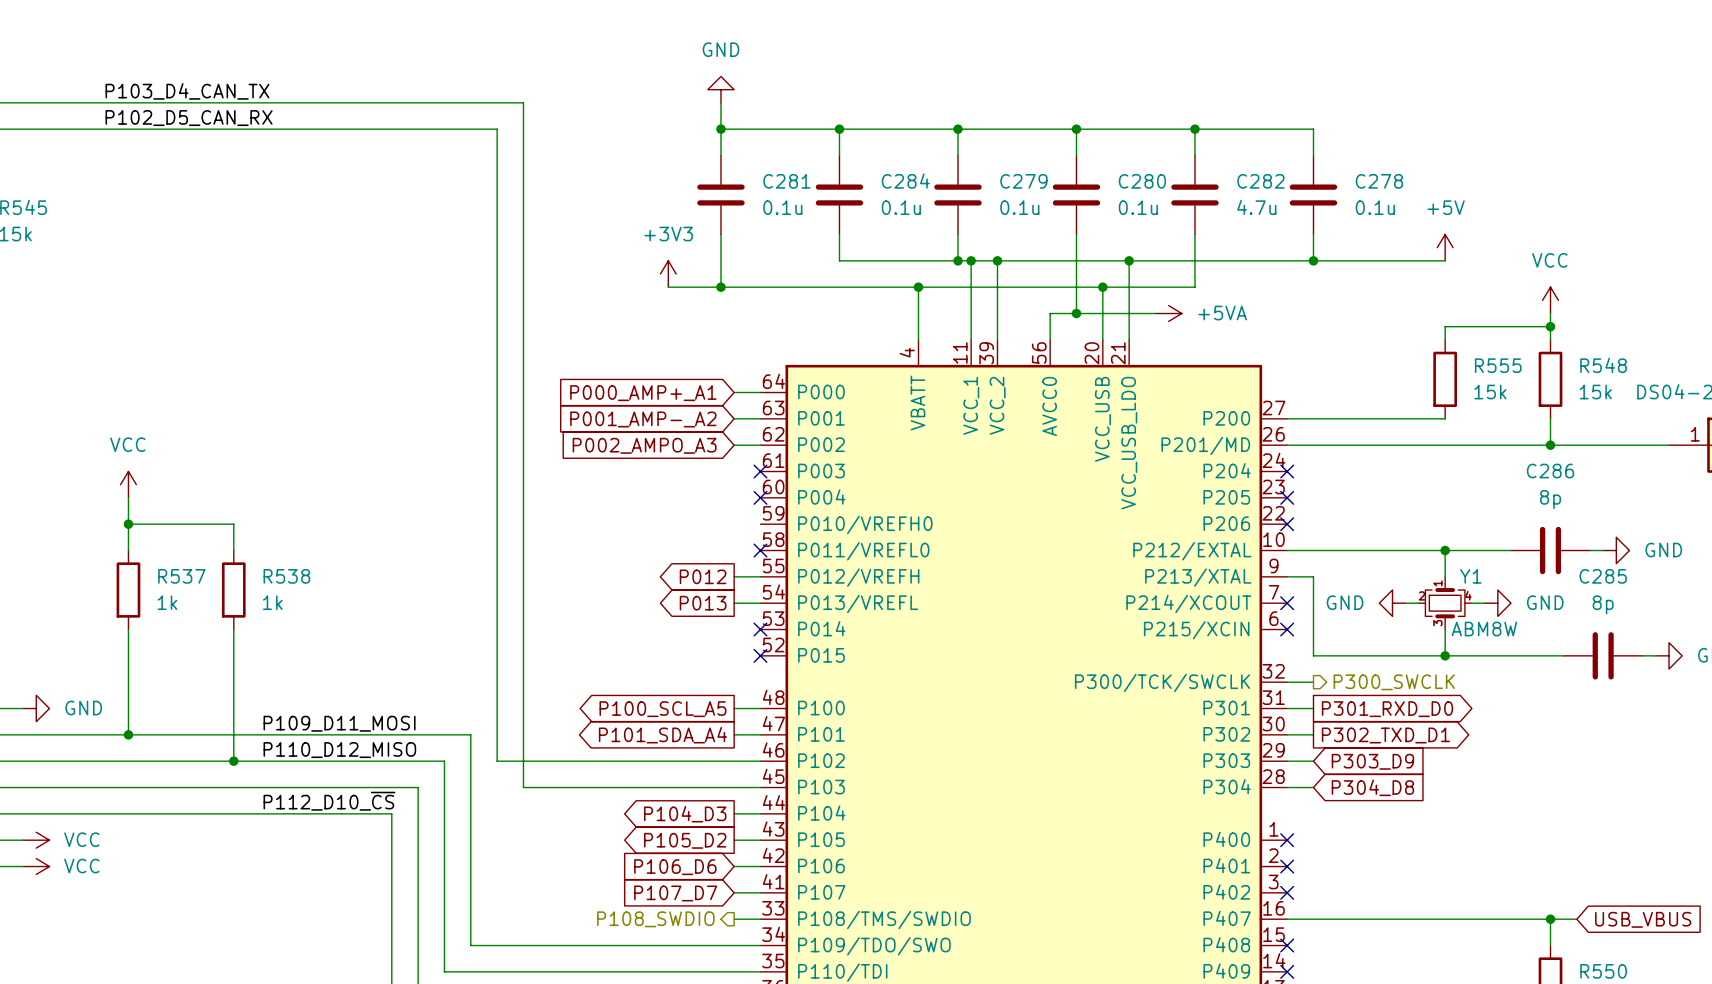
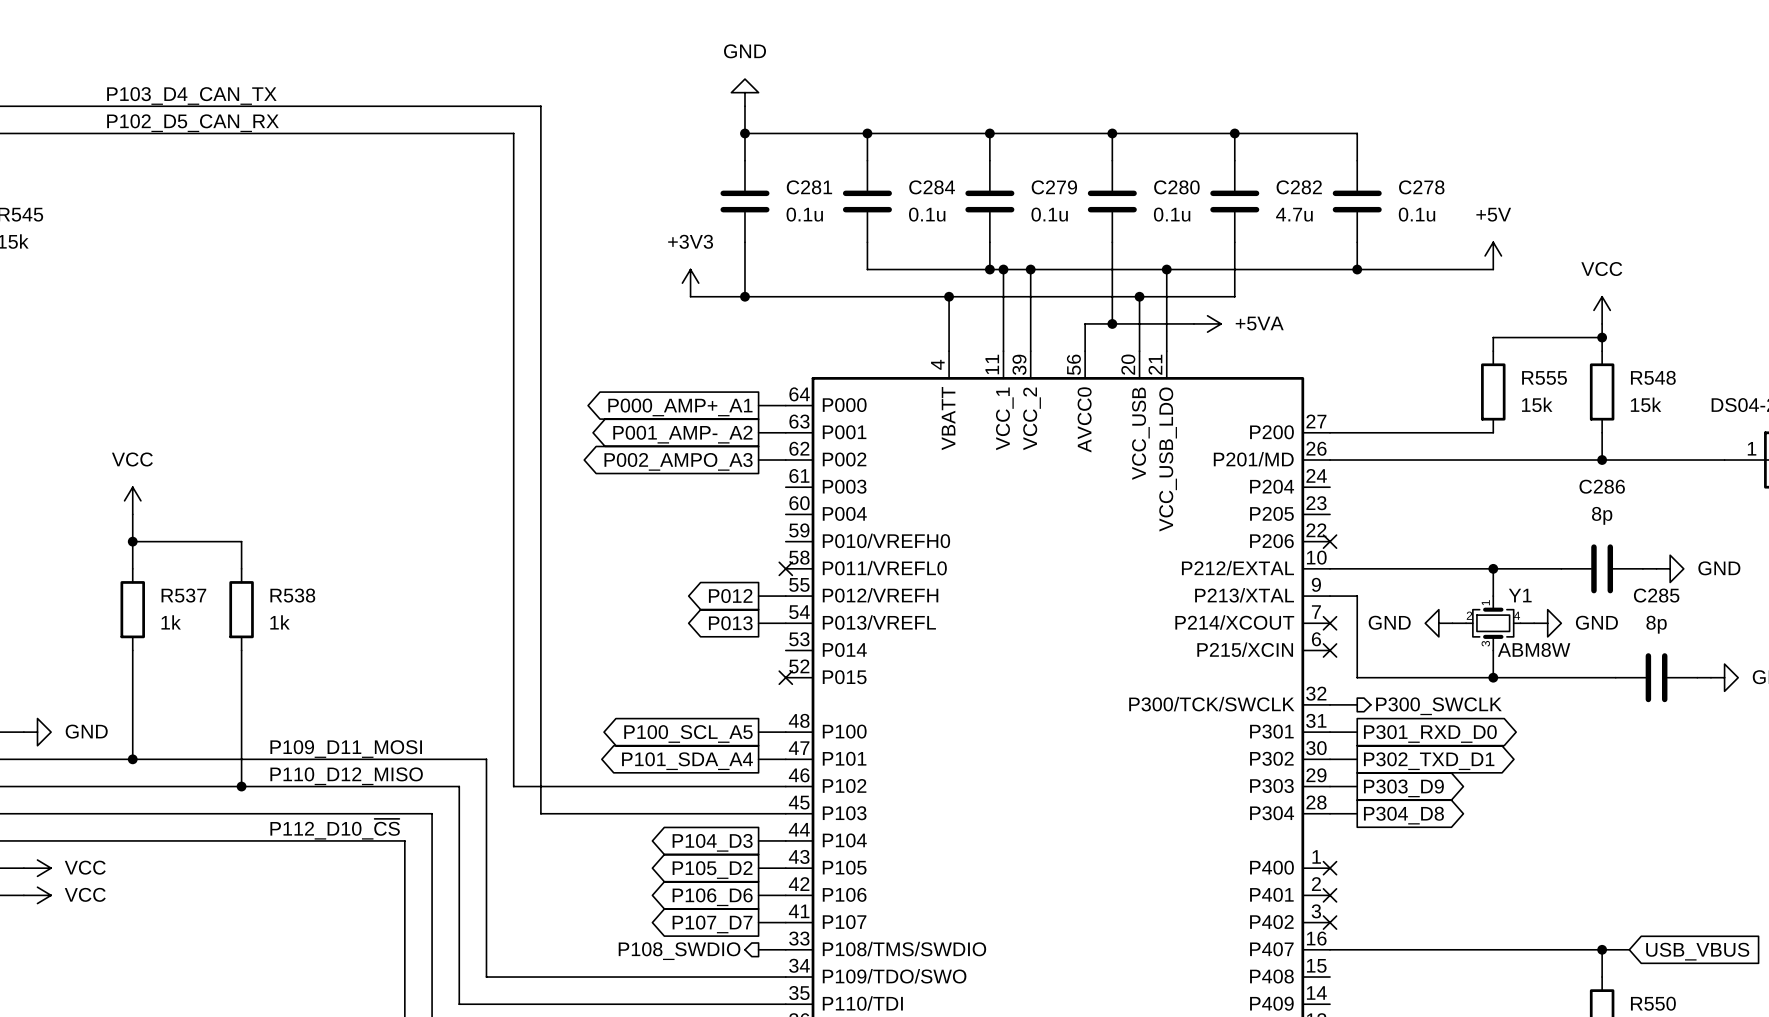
global label shape: input (643, 393) -> output (680, 407)
global label shape: input (643, 419) -> output (682, 434)
global label shape: input (644, 445) -> output (678, 461)
no-connect mark: (760, 471) -> none
no-connect mark: (1287, 471) -> none
no-connect mark: (760, 497) -> none
no-connect mark: (1287, 497) -> none
no-connect mark: (760, 629) -> none
global label shape: input (1372, 761) -> output (1403, 788)
global label shape: input (1372, 787) -> output (1403, 815)
global label shape: input (675, 867) -> output (712, 897)
global label shape: input (675, 893) -> output (712, 924)
no-connect mark: (1287, 945) -> none
no-connect mark: (1287, 971) -> none

